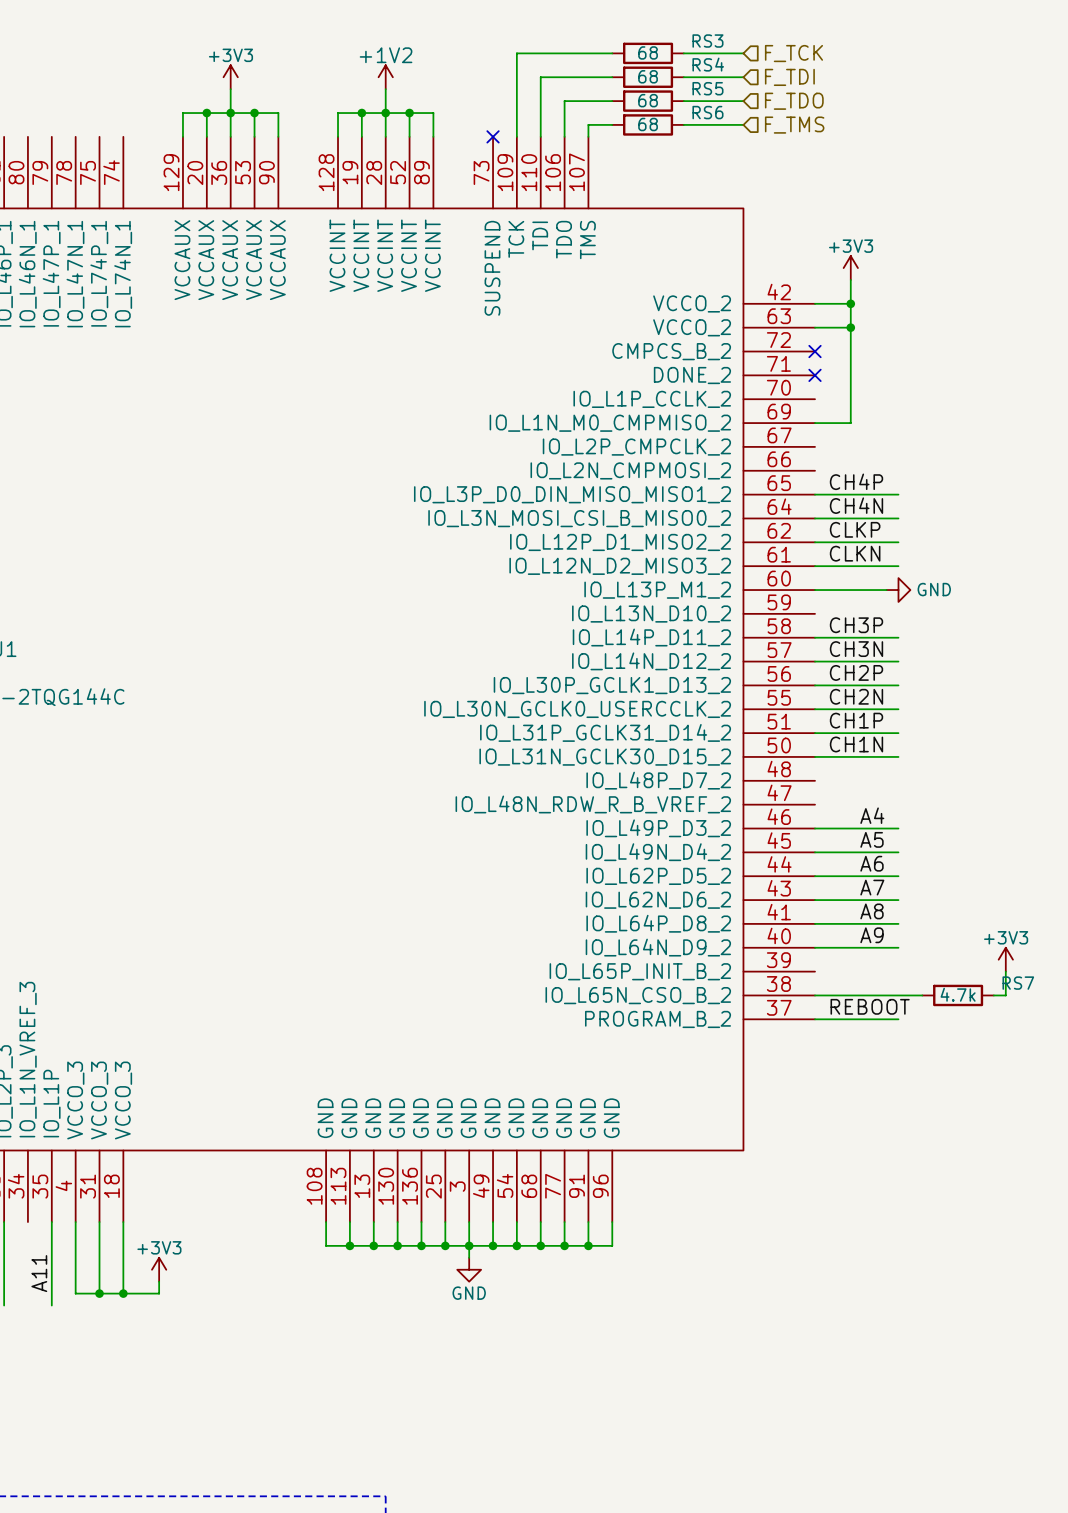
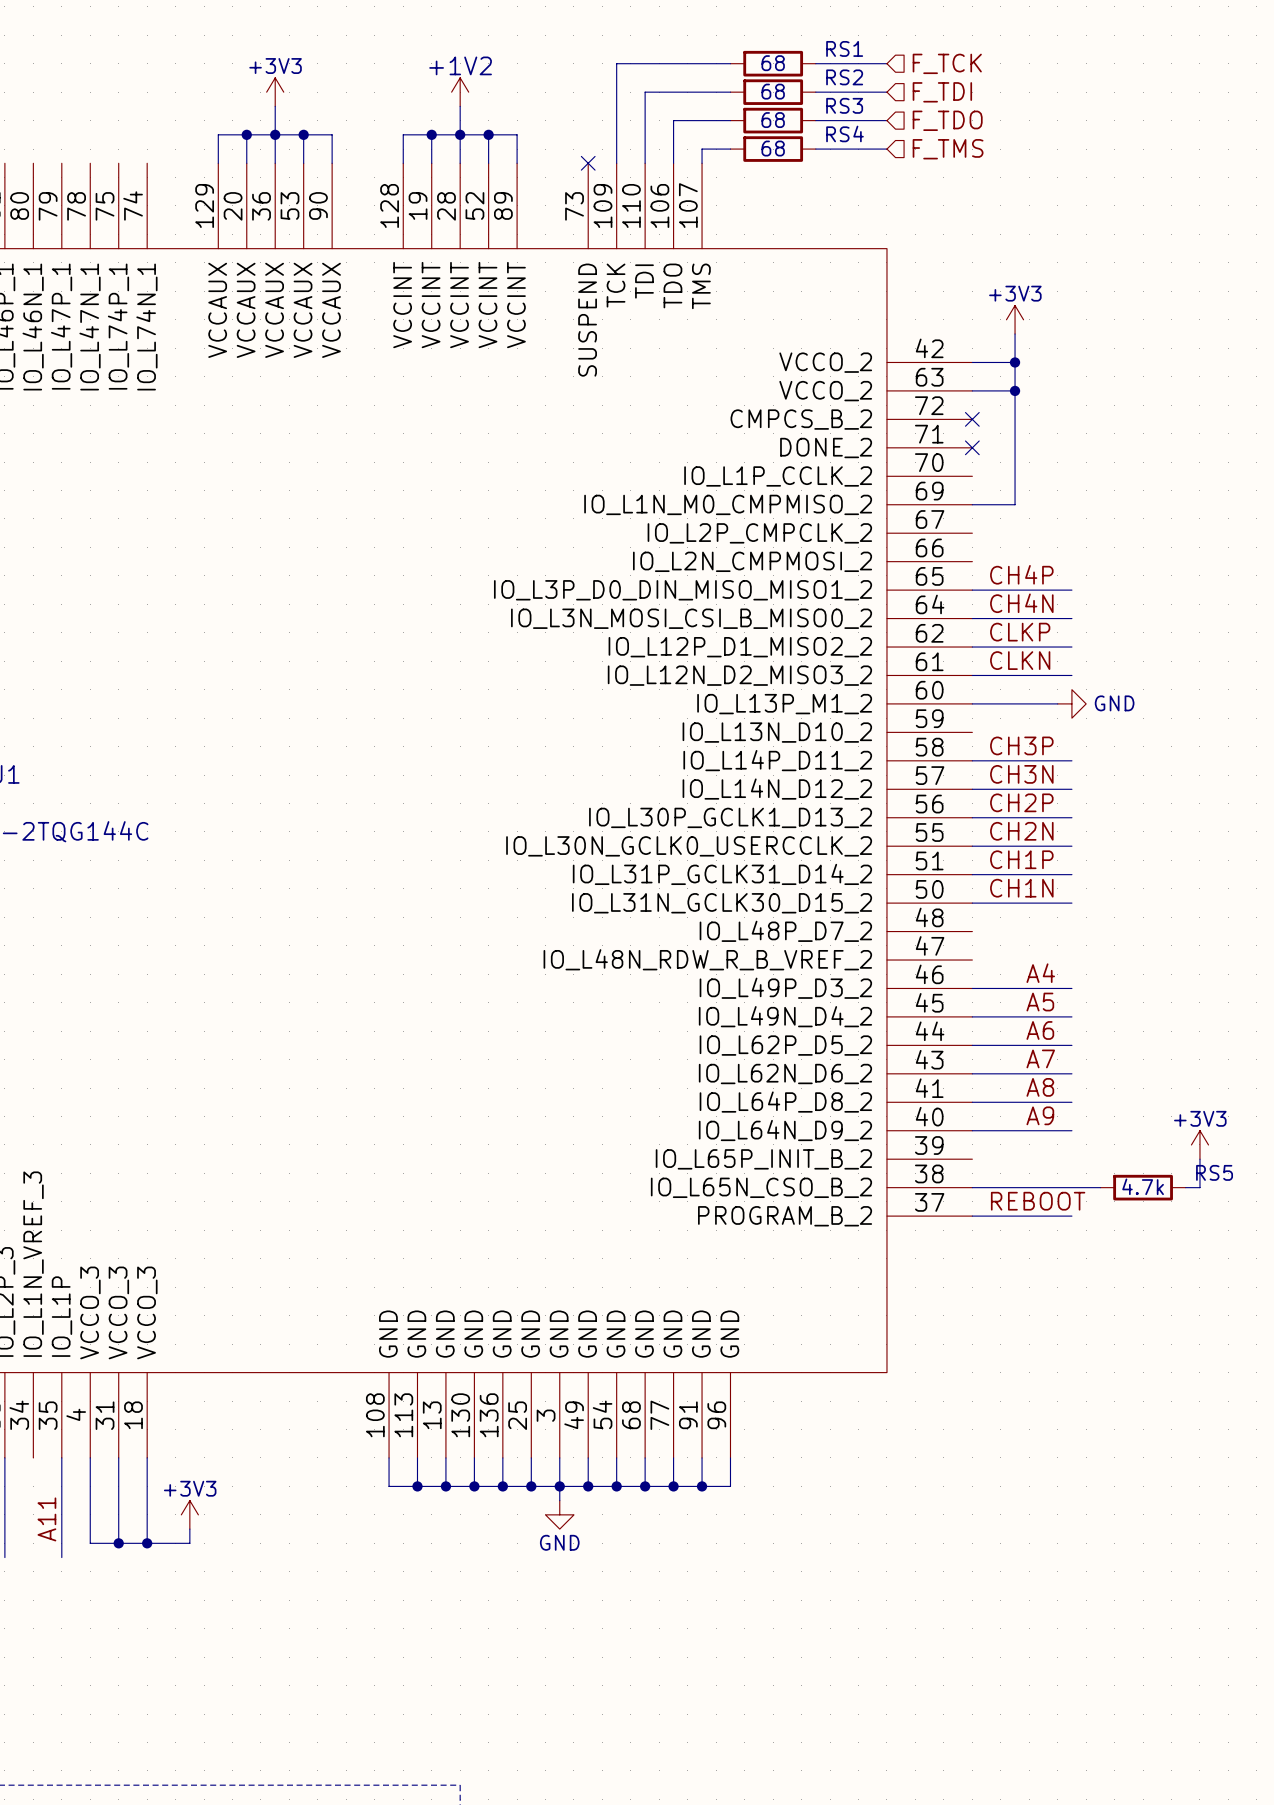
RS3 name: RS3 (707, 41) -> RS1 (844, 48)
RS4 name: RS4 (708, 64) -> RS2 (844, 77)
RS5 name: RS5 (707, 88) -> RS3 (844, 105)
RS6 name: RS6 (707, 112) -> RS4 (844, 133)
RS7 name: RS7 (1018, 983) -> RS5 (1214, 1172)

